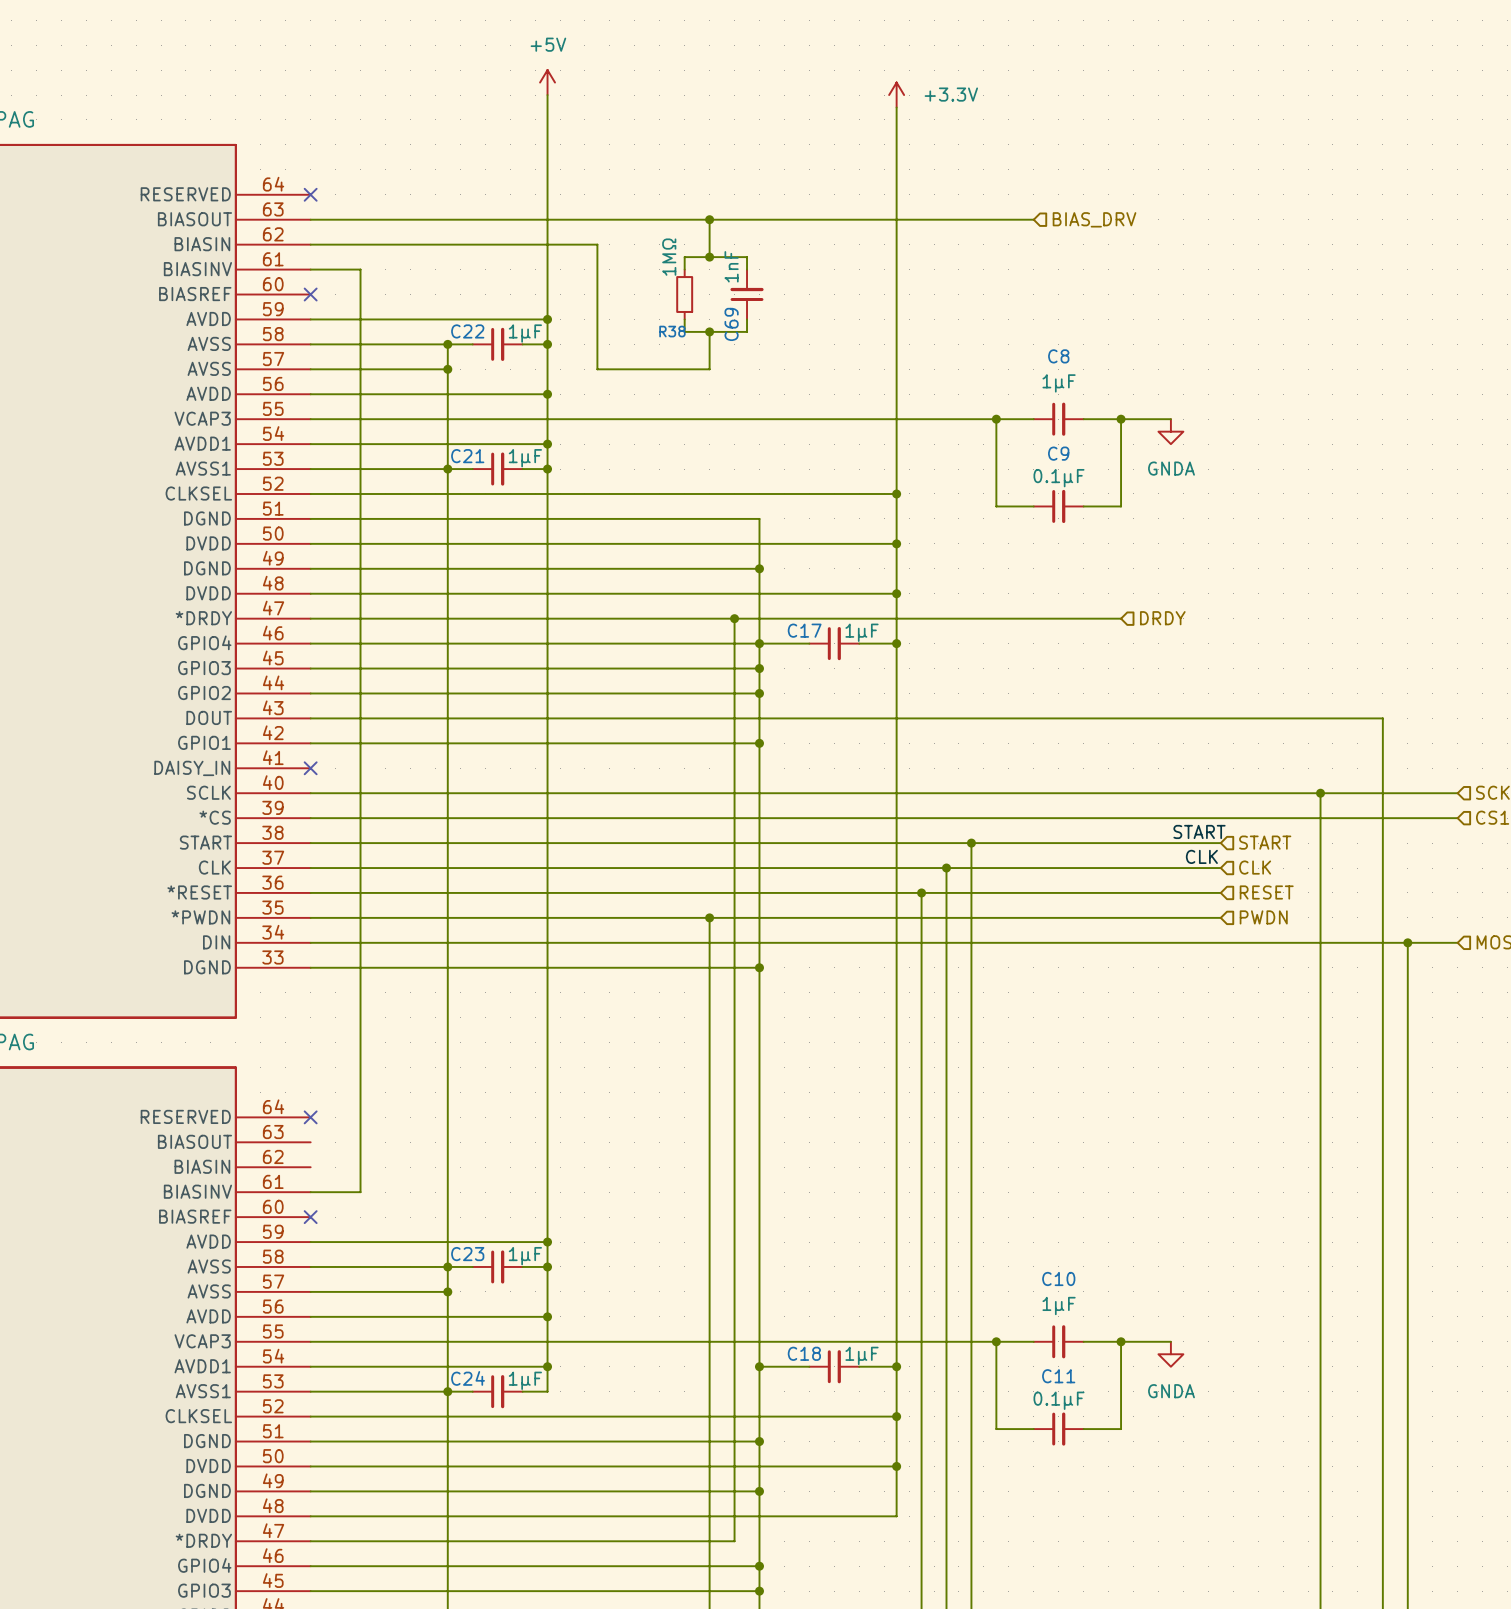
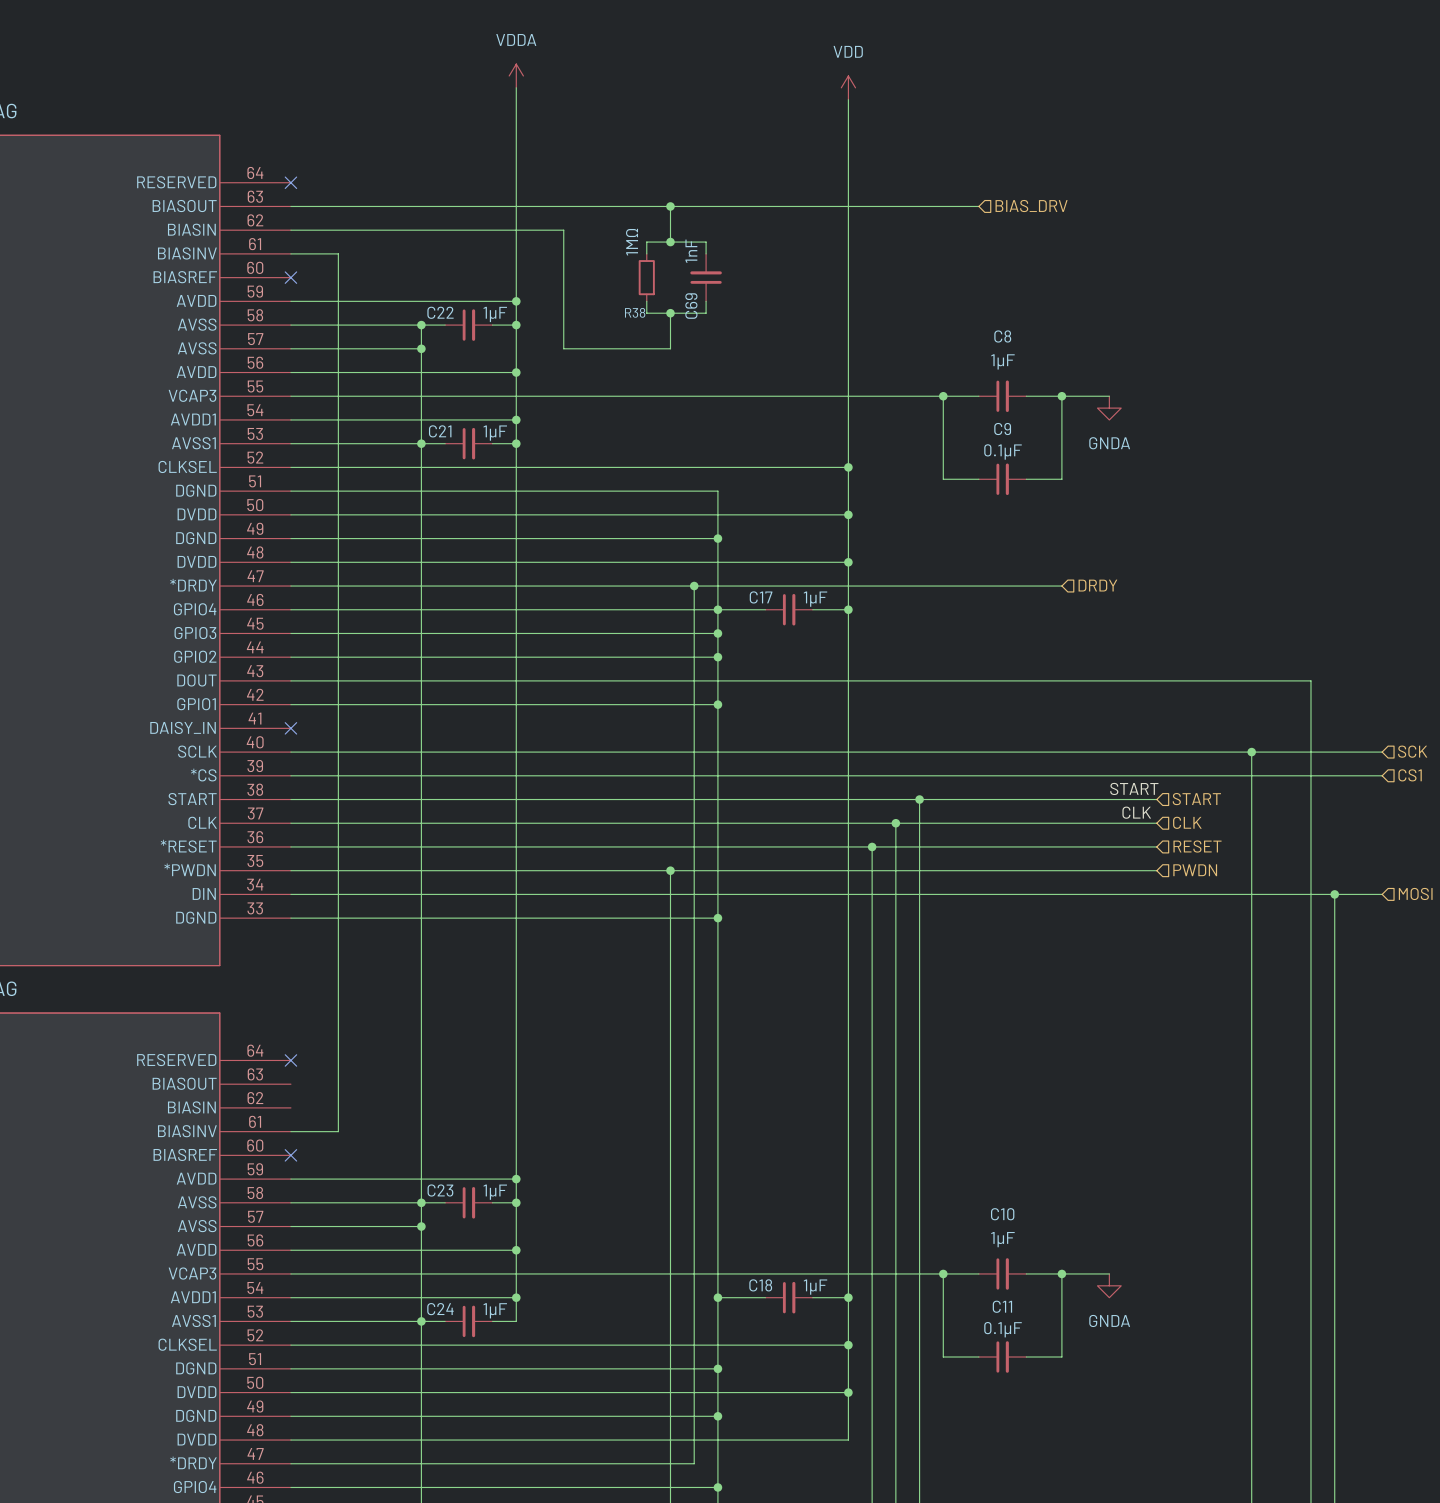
power symbol: +5V (547, 82) -> VDDA (516, 75)
power symbol: +3.3V (896, 95) -> VDD (848, 87)

